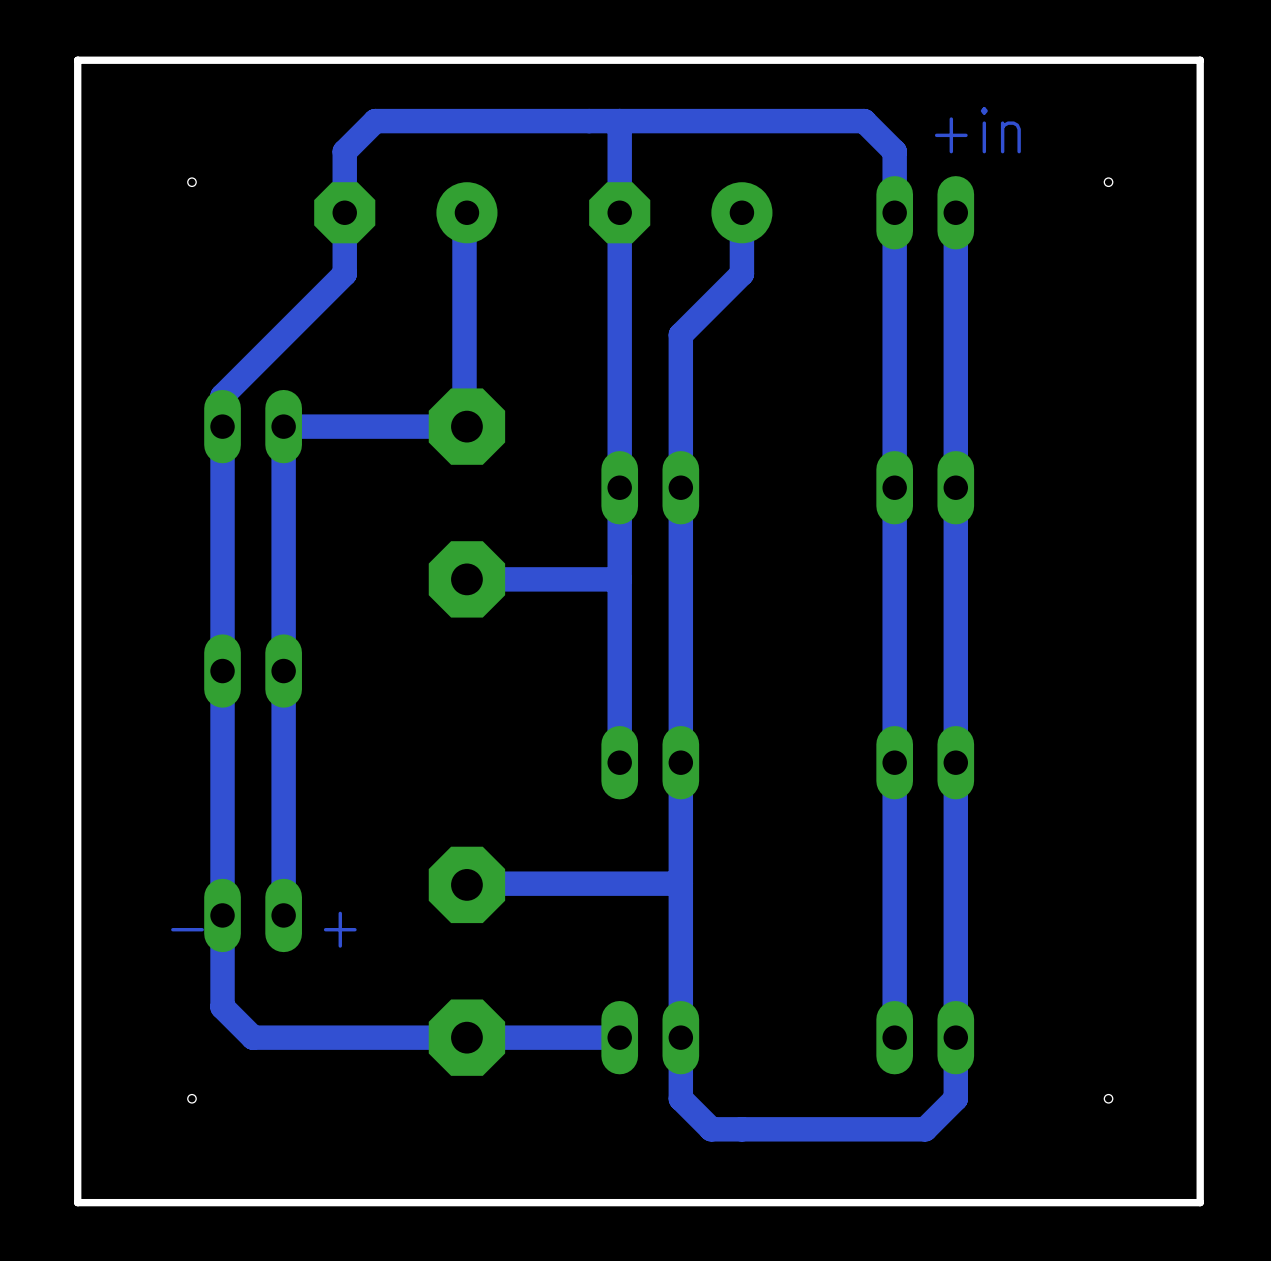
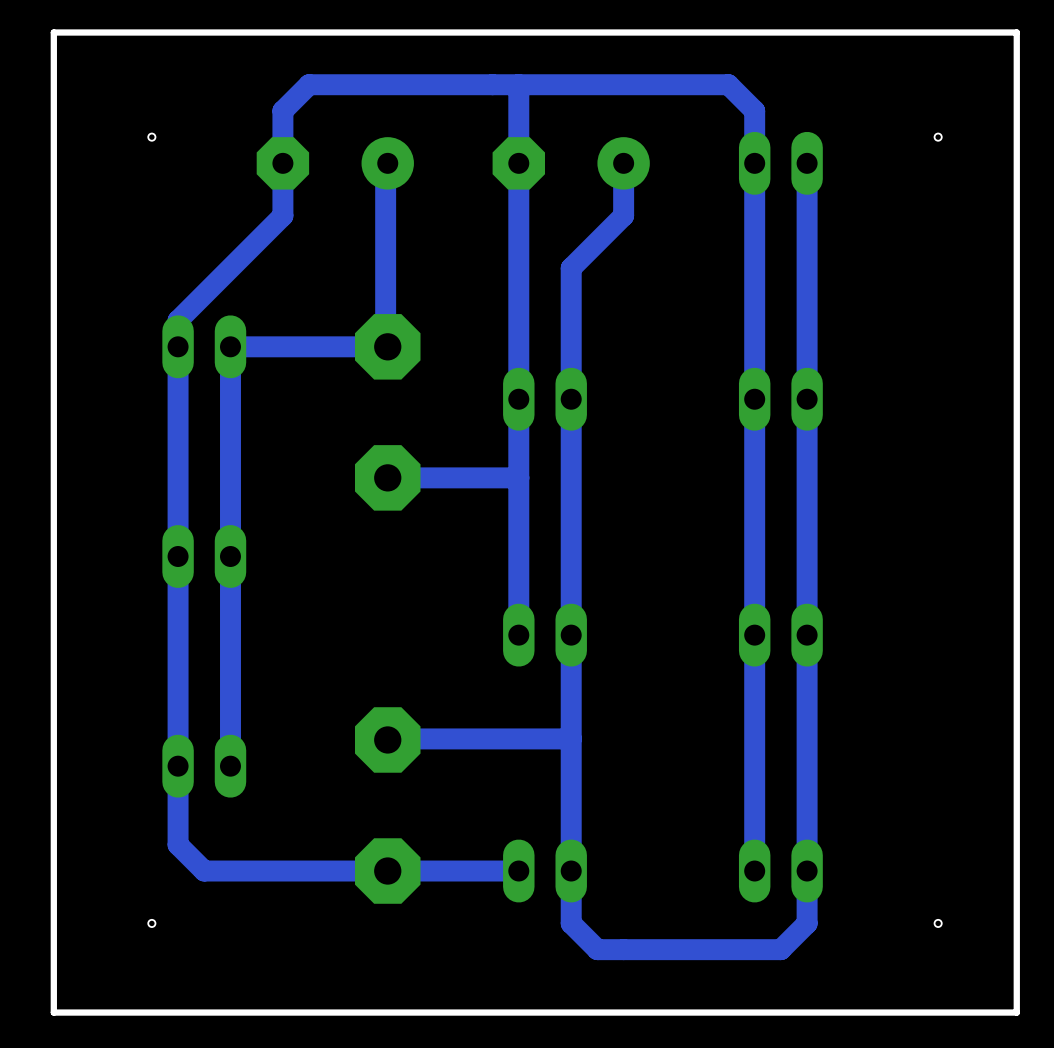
text: +in (977, 130) -> none
text: - (187, 929) -> none
text: + (340, 929) -> none

